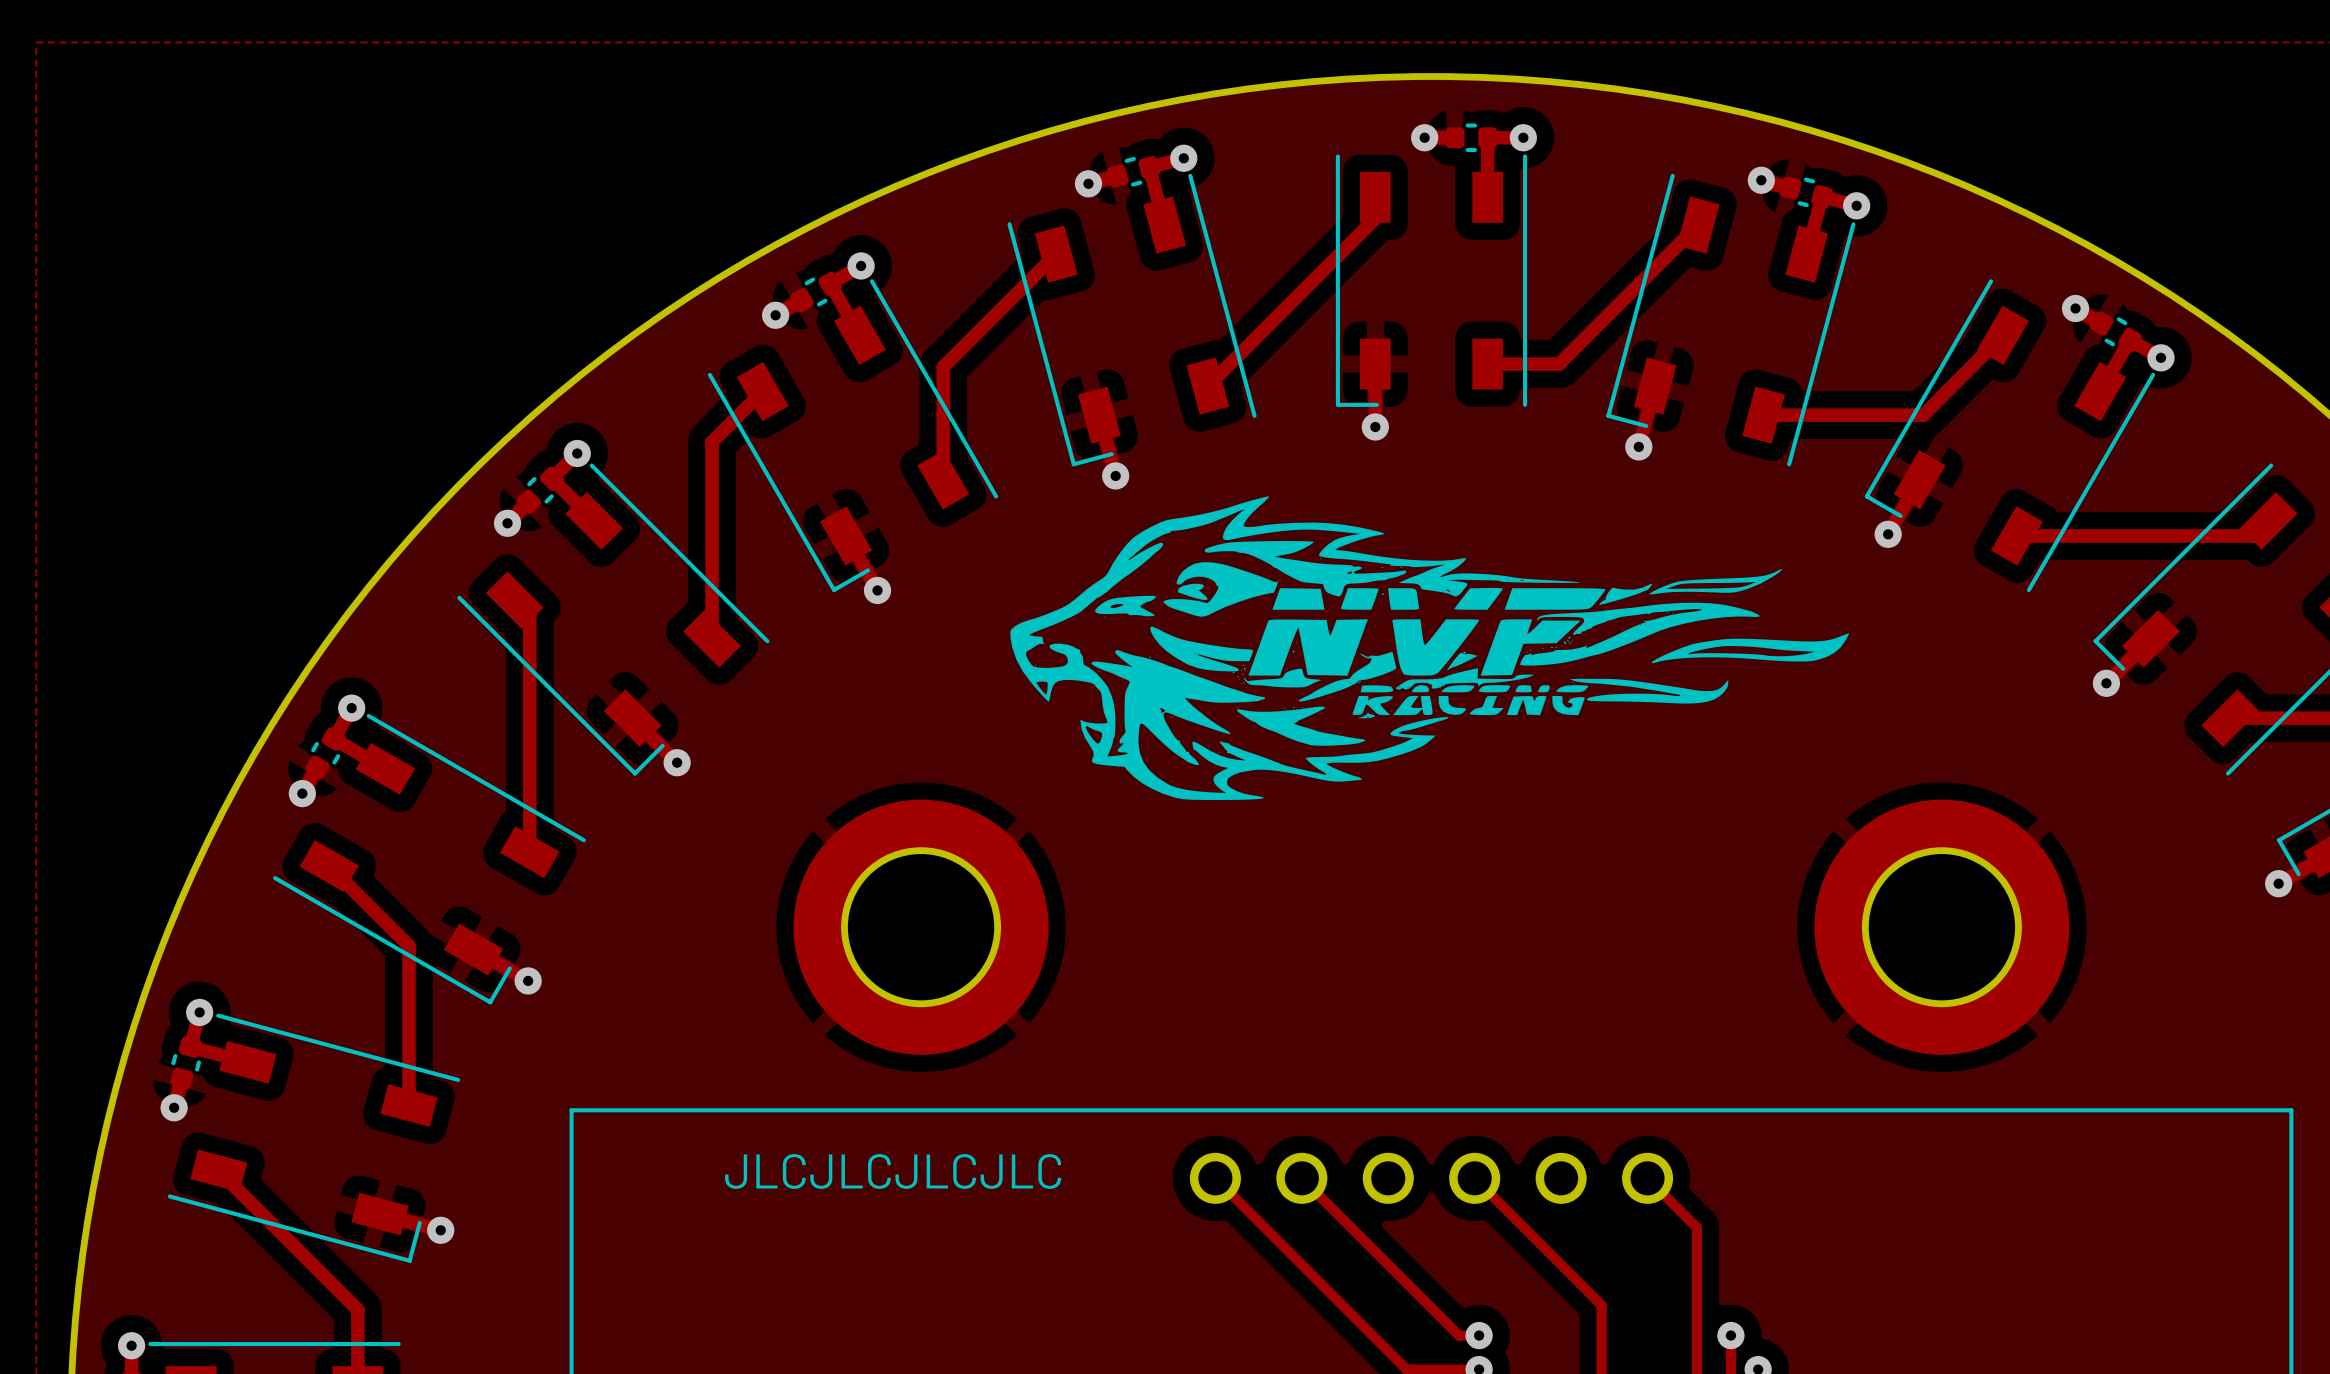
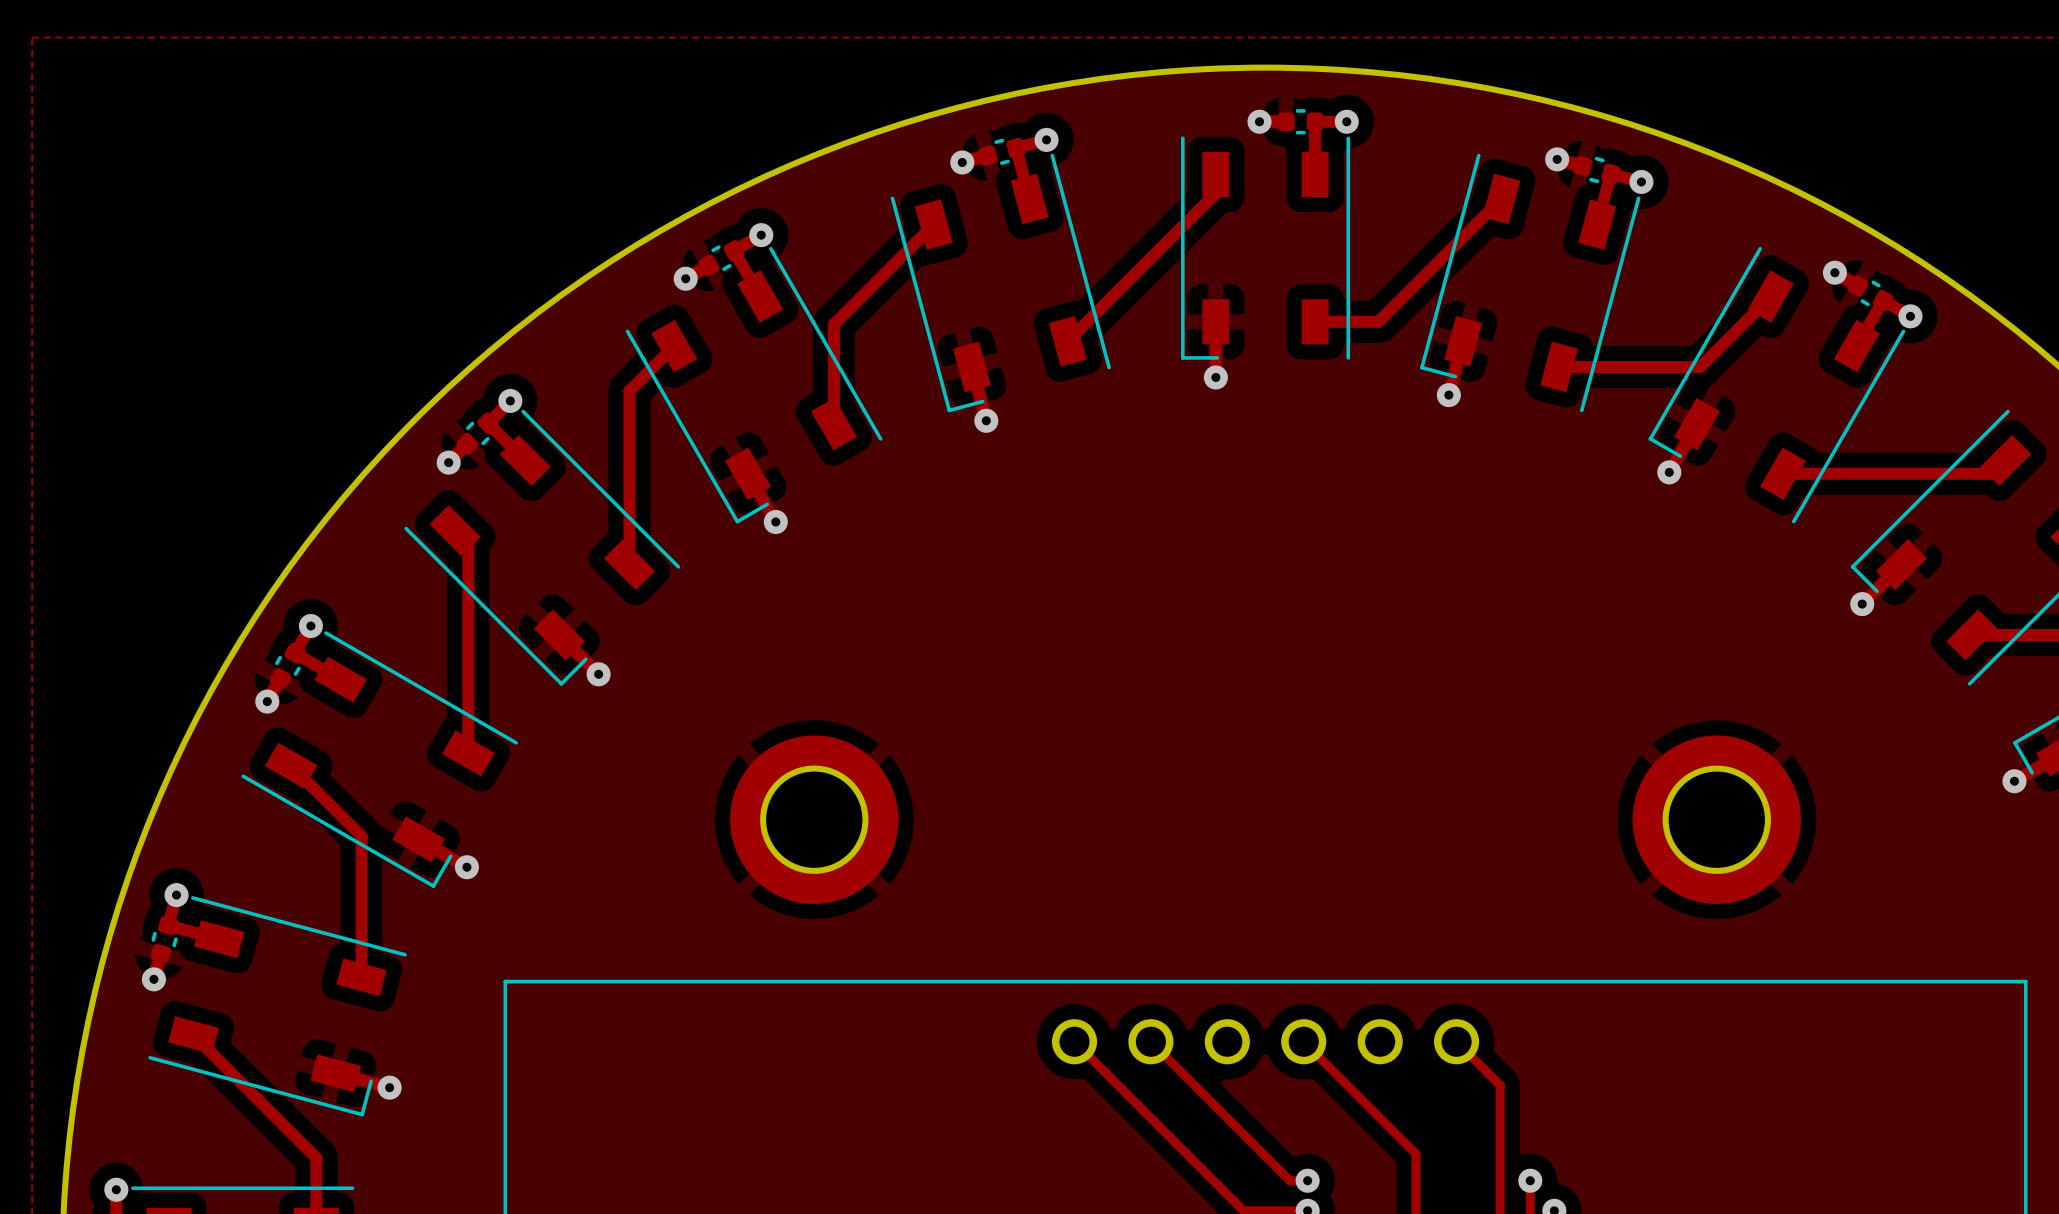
drawing: [1010, 496, 1850, 800] -> none
part footprint: [793, 799, 1049, 1055] -> [730, 735, 899, 904]
part footprint: [1814, 799, 2070, 1055] -> [1632, 735, 1802, 904]
text: JLCJLCJLCJLC (893, 1171) -> none

